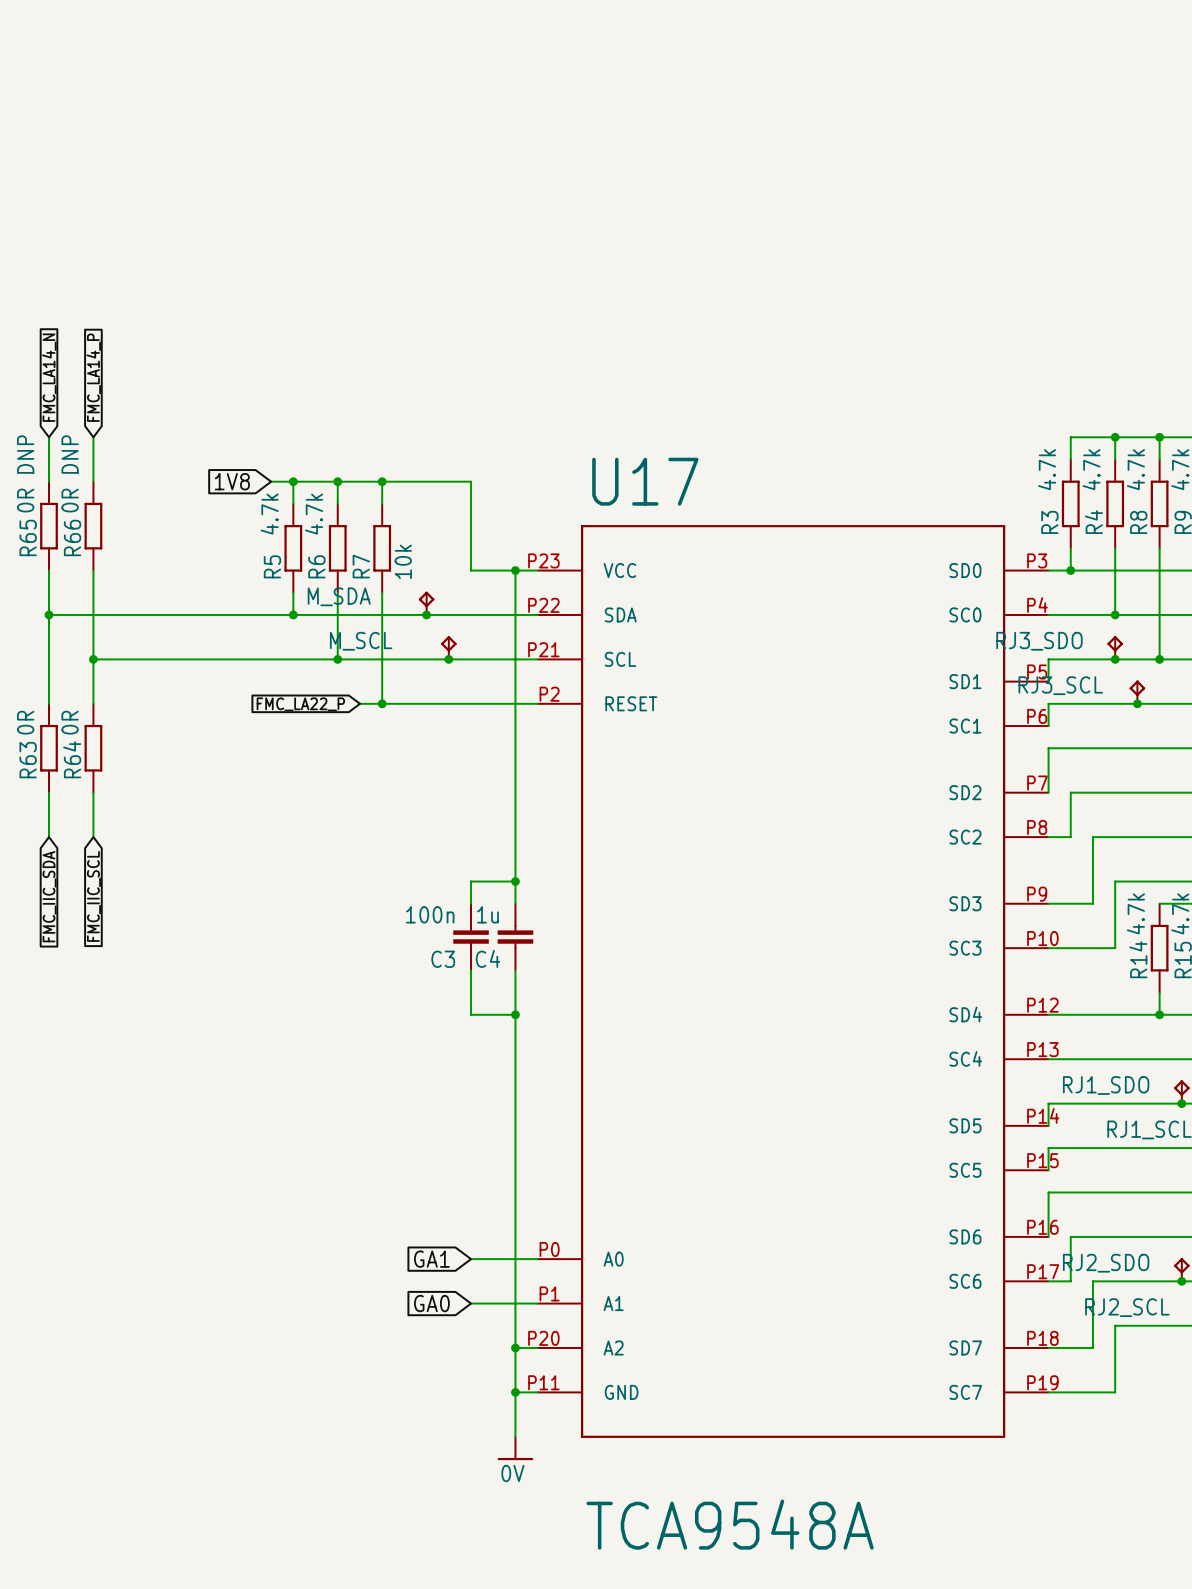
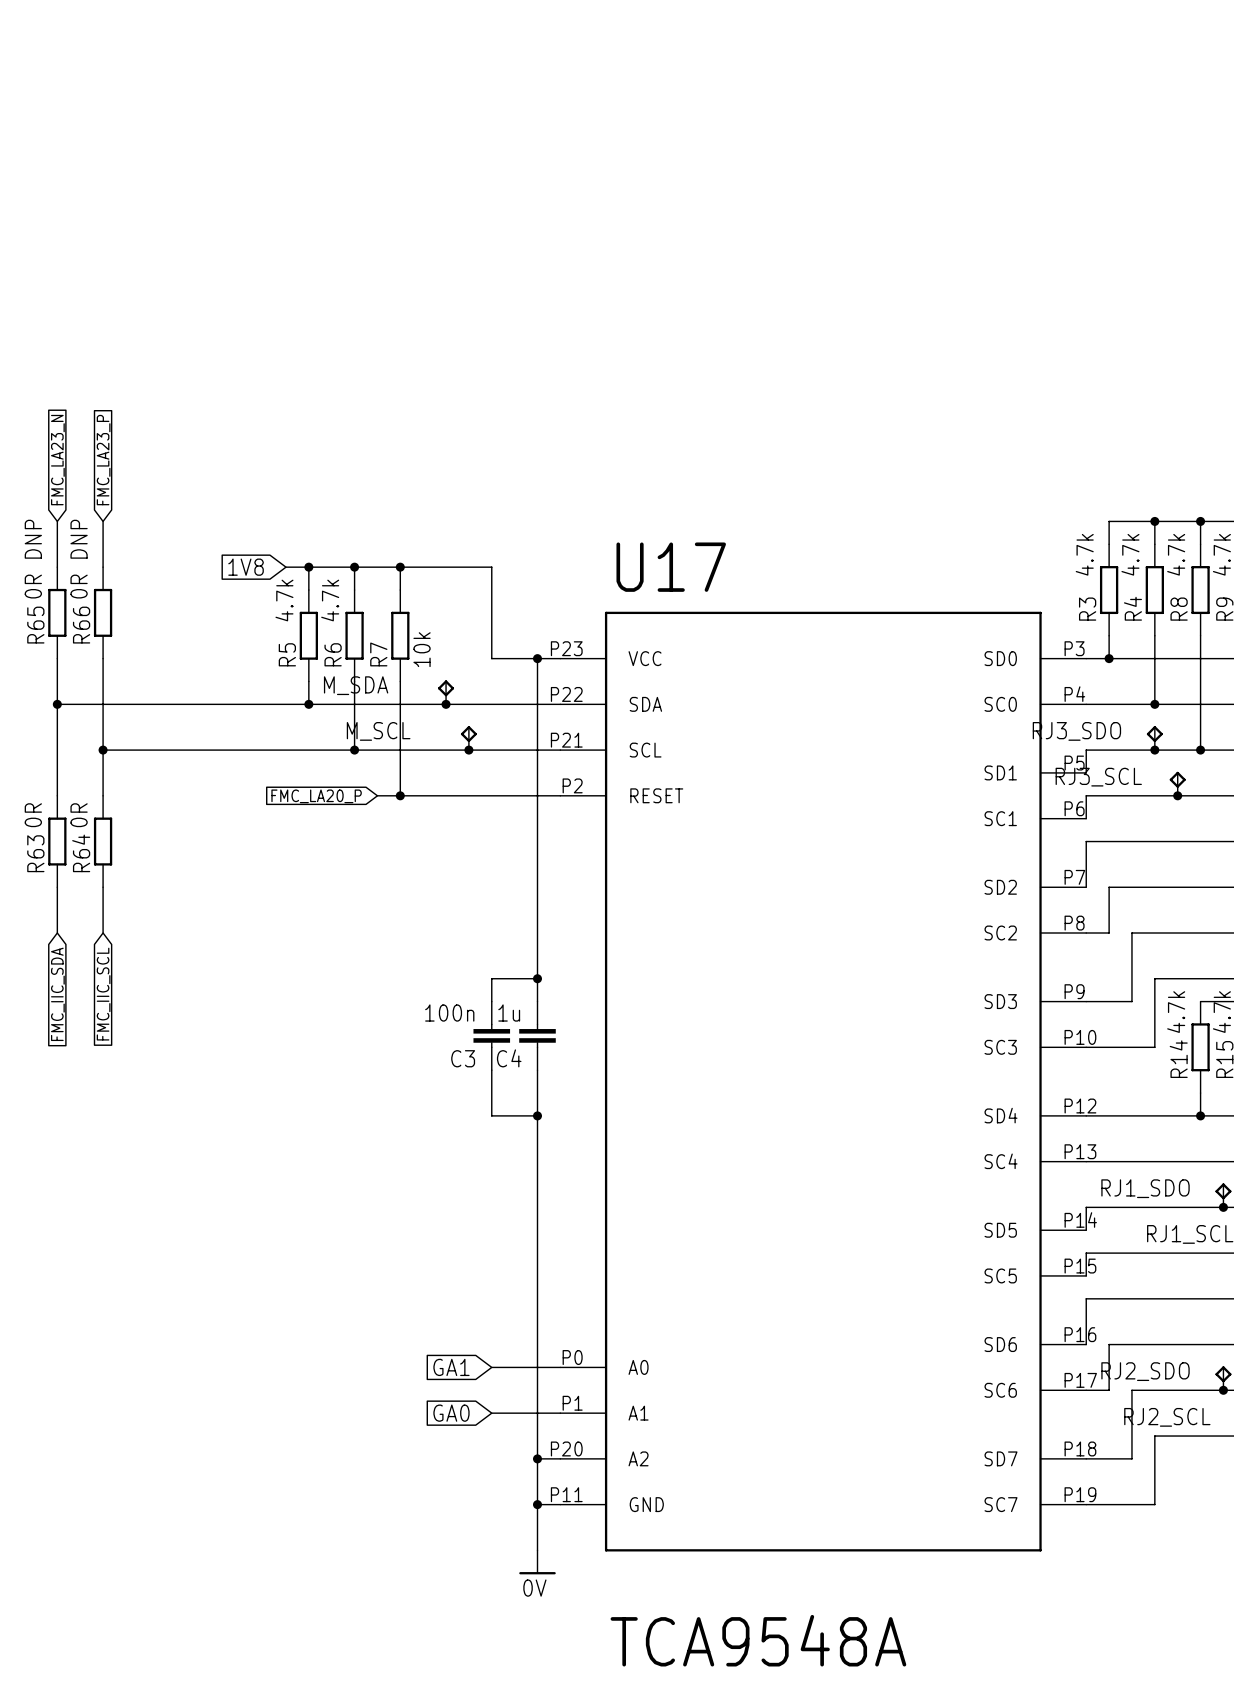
global label: FMC_LA14_N (49, 377) -> FMC_LA23_N (57, 460)
global label: FMC_LA14_P (93, 377) -> FMC_LA23_P (103, 460)
global label: FMC_LA22_P (300, 704) -> FMC_LA20_P (316, 796)

